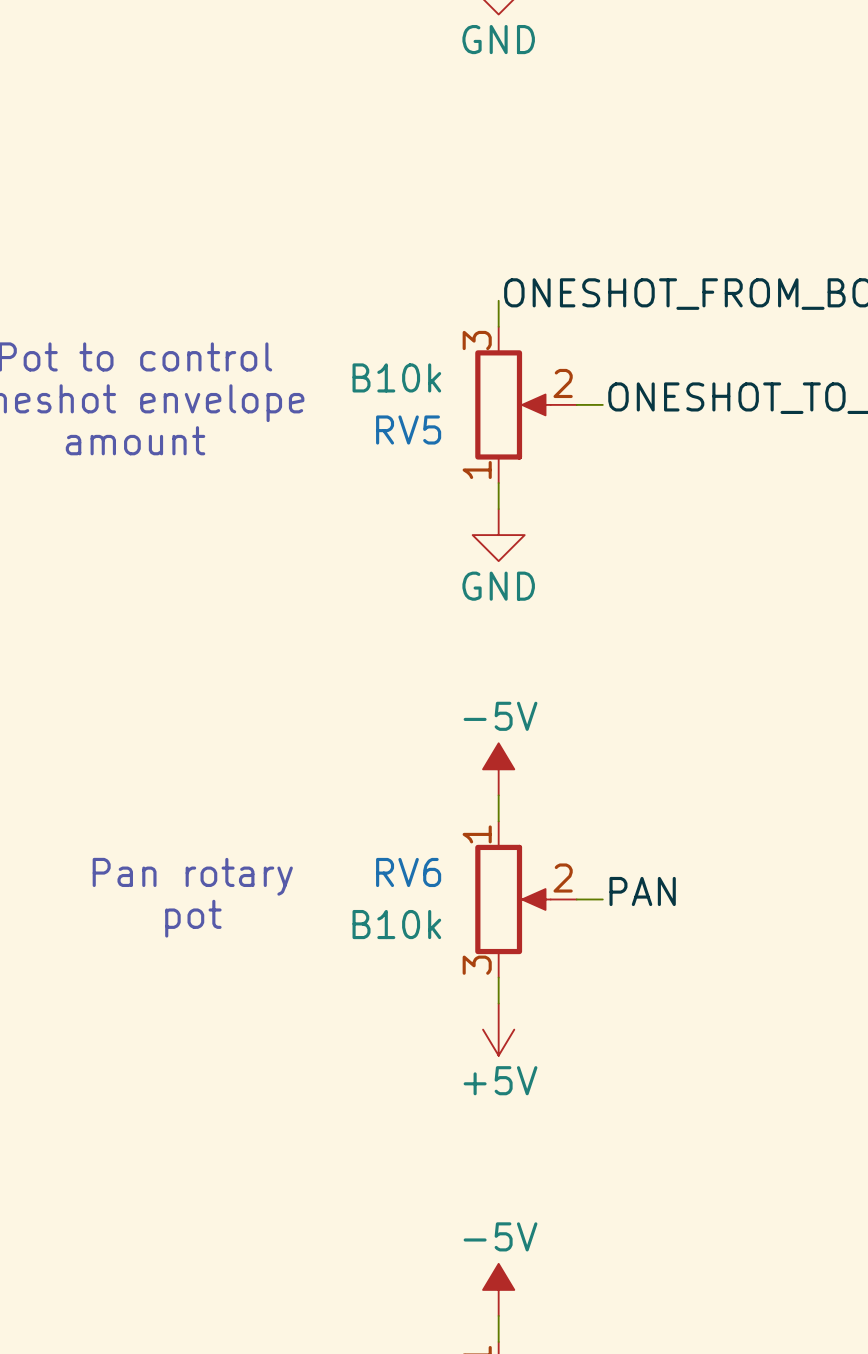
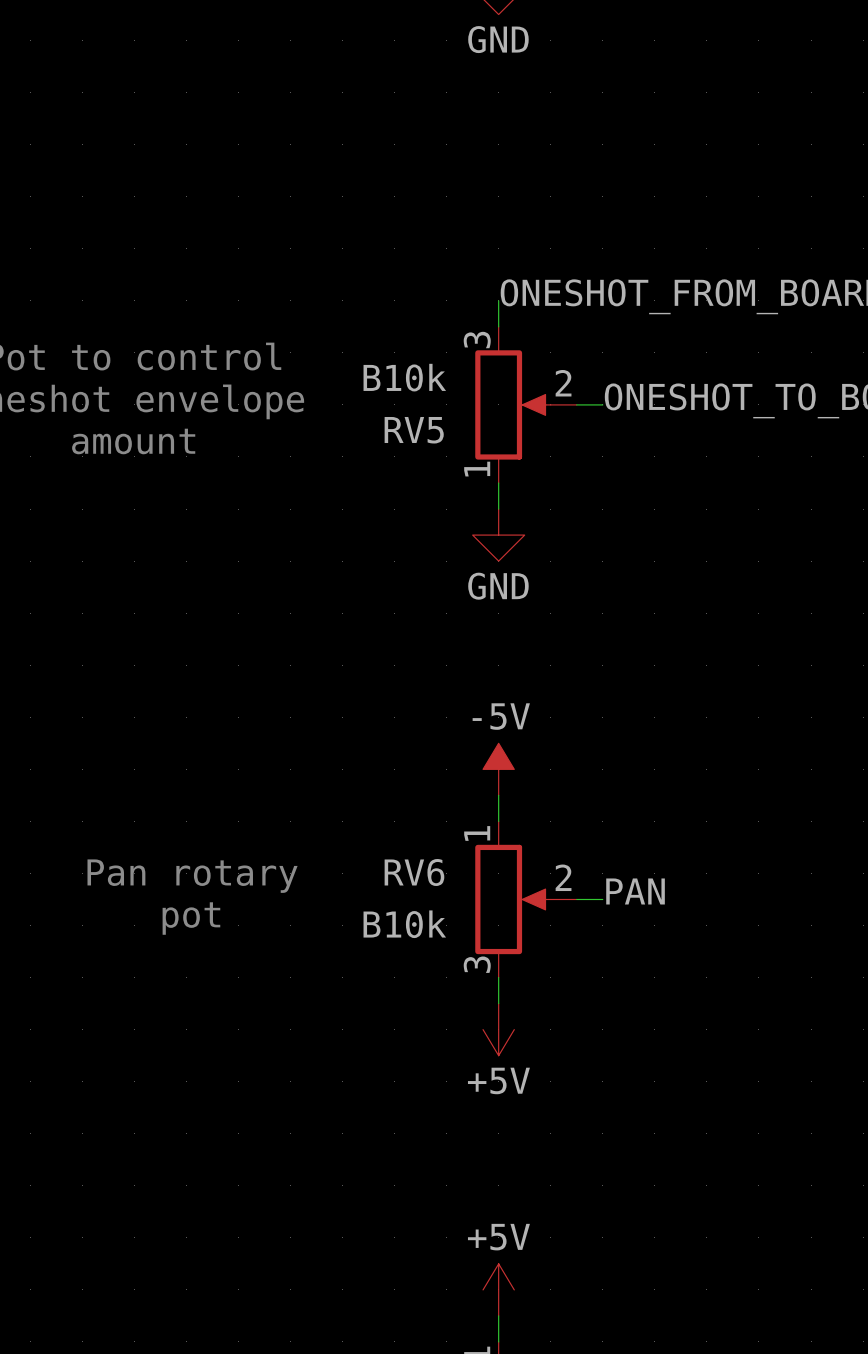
power symbol: -5V (498, 1289) -> +5V (498, 1289)

